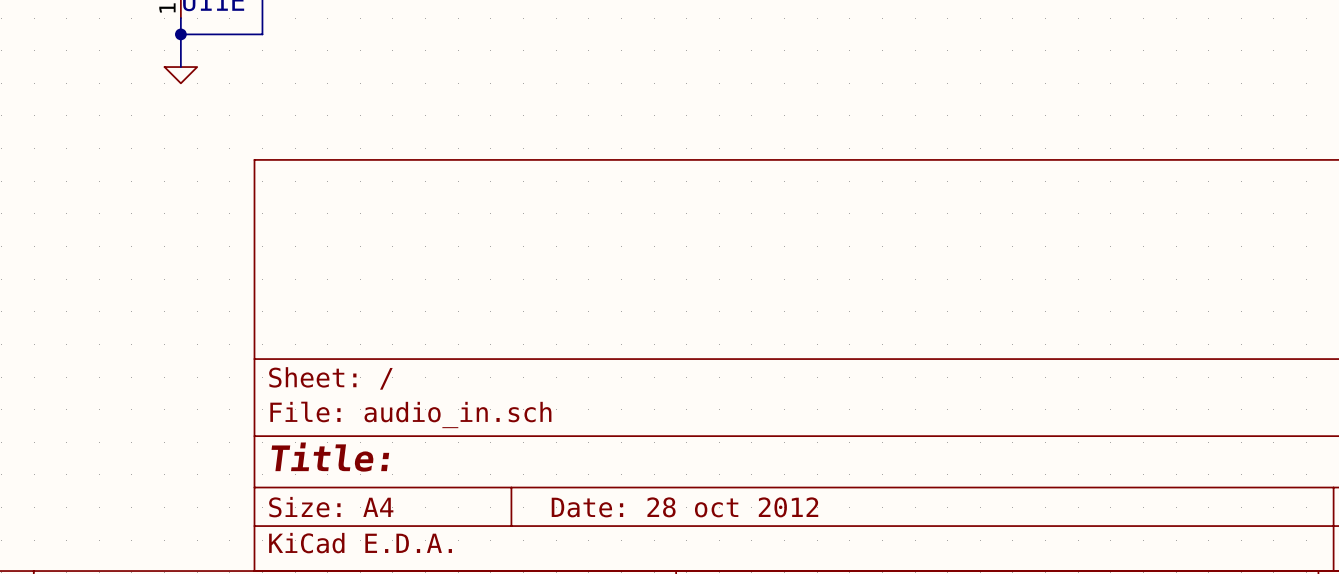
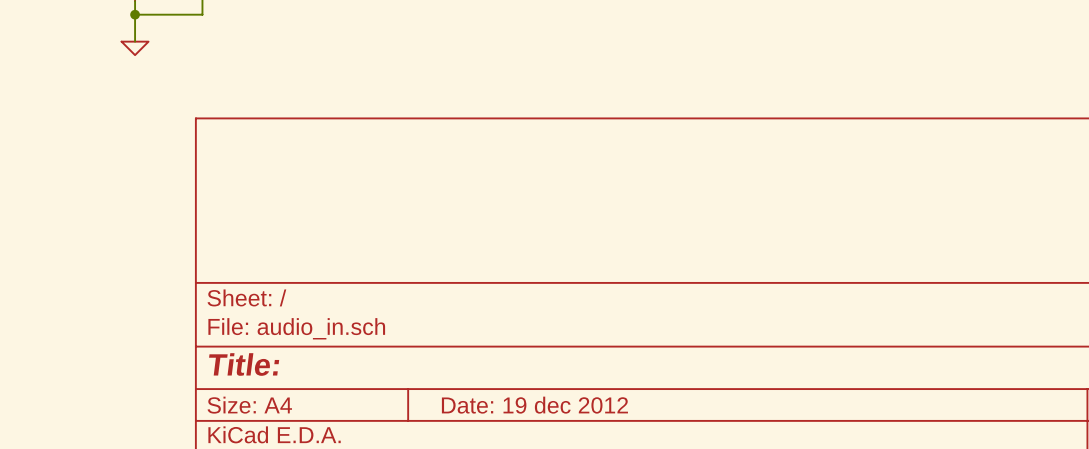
title block: Date: 28 oct 2012 (684, 507) -> Date: 19 dec 2012 (534, 405)

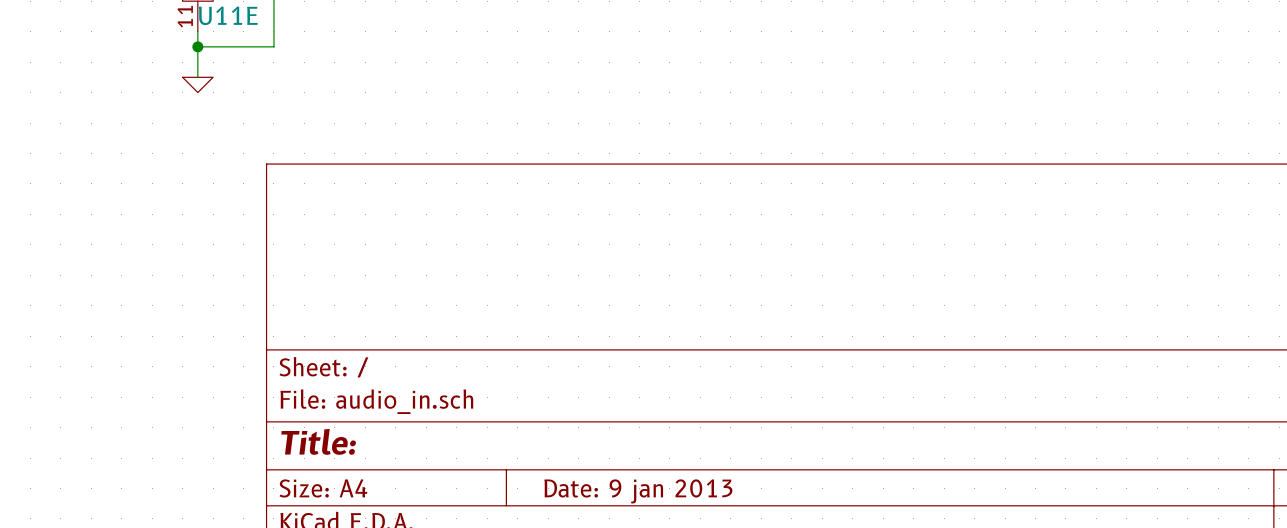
title block: Date: 19 dec 2012 (534, 405) -> Date: 9 jan 2013 (638, 491)

